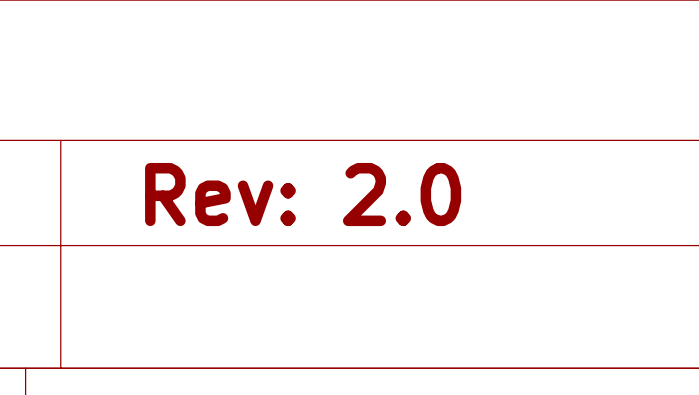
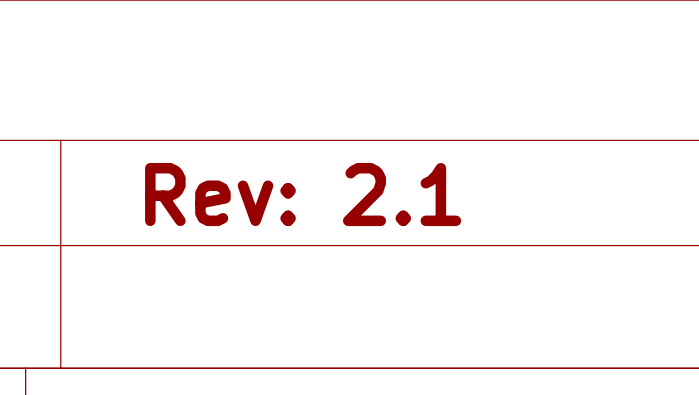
title block: Rev: 2.0 (303, 194) -> Rev: 2.1 (303, 194)

